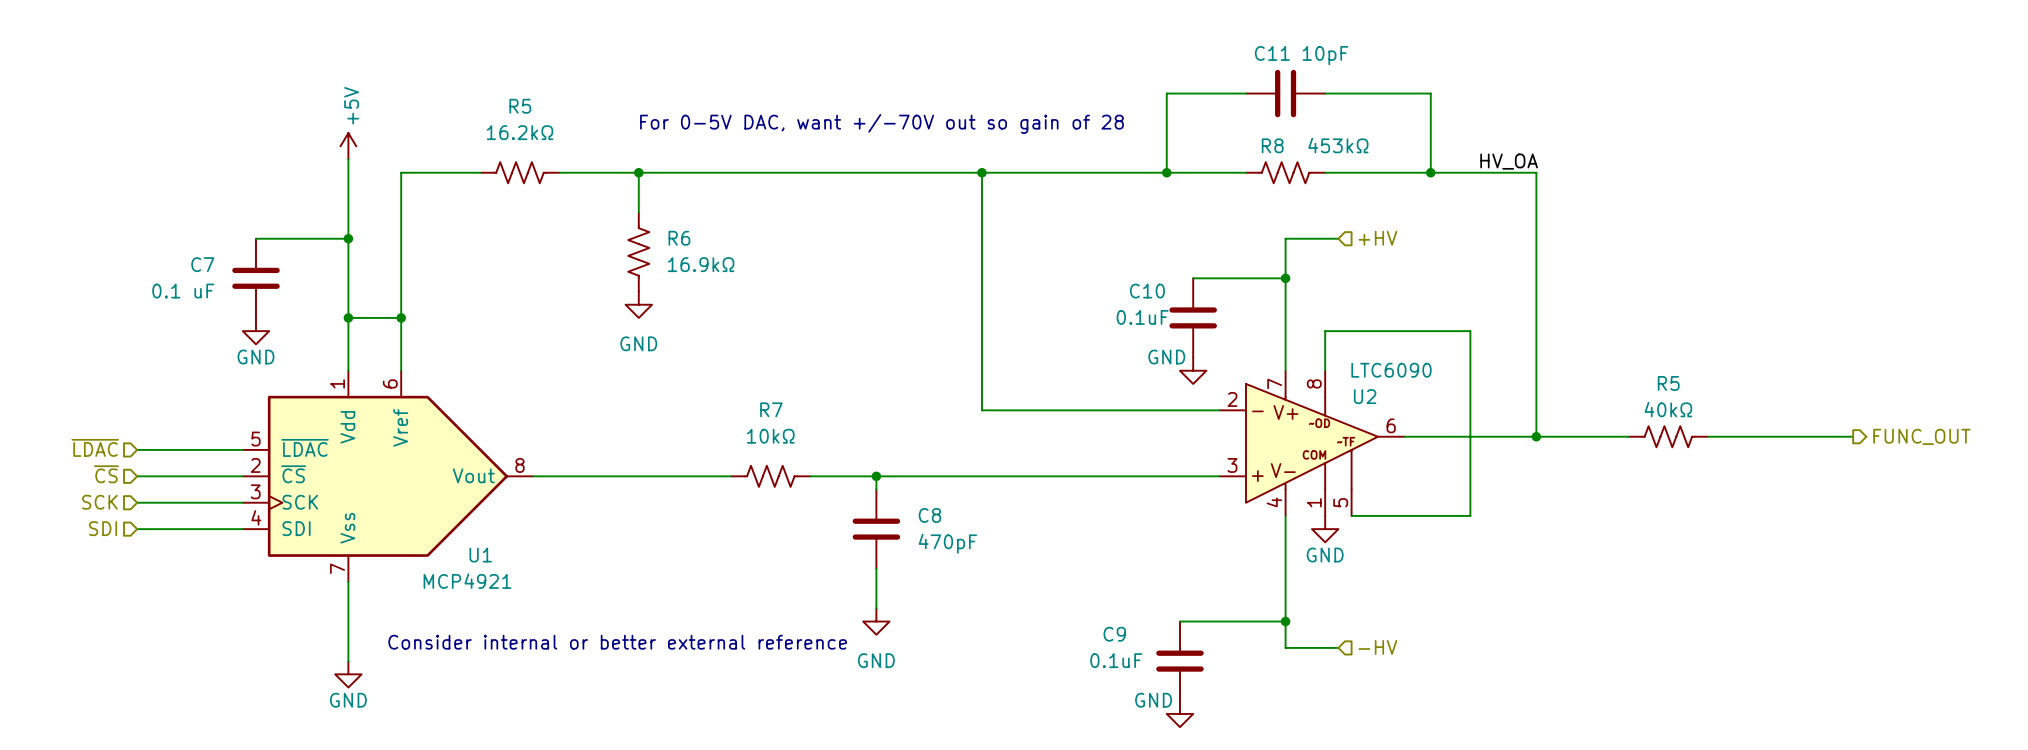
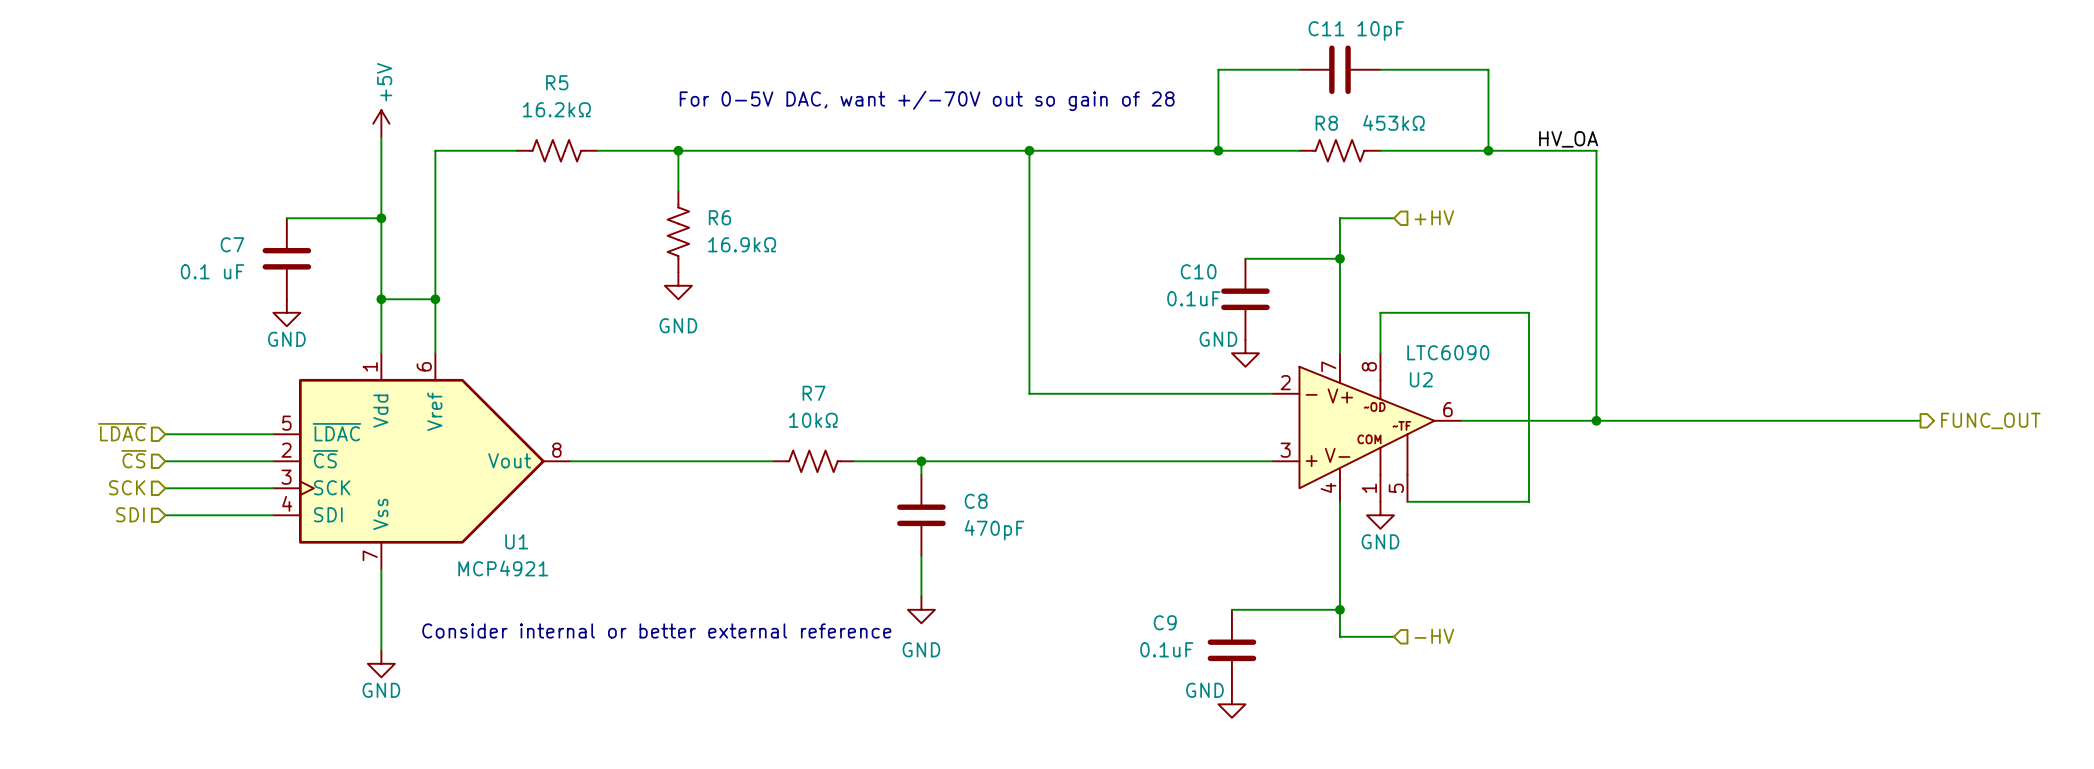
R5: 40kΩ (1668, 436) -> none

